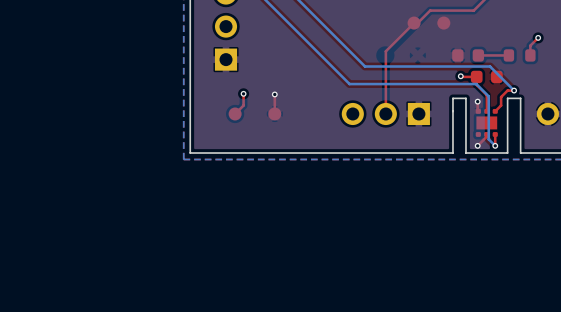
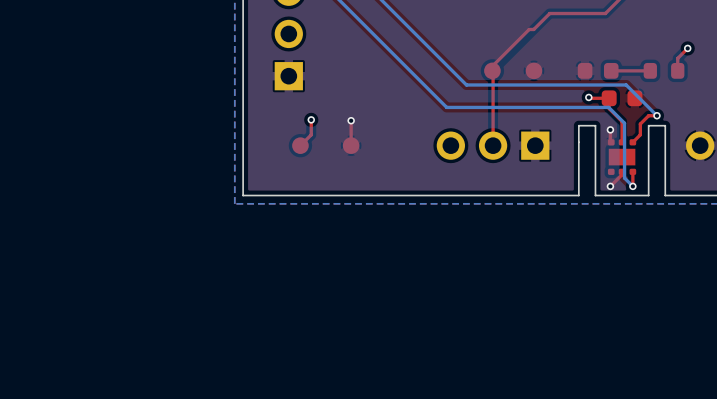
part: (414, 23) -> none
part: (443, 23) -> none
part: none -> (492, 70)
part: none -> (533, 70)

